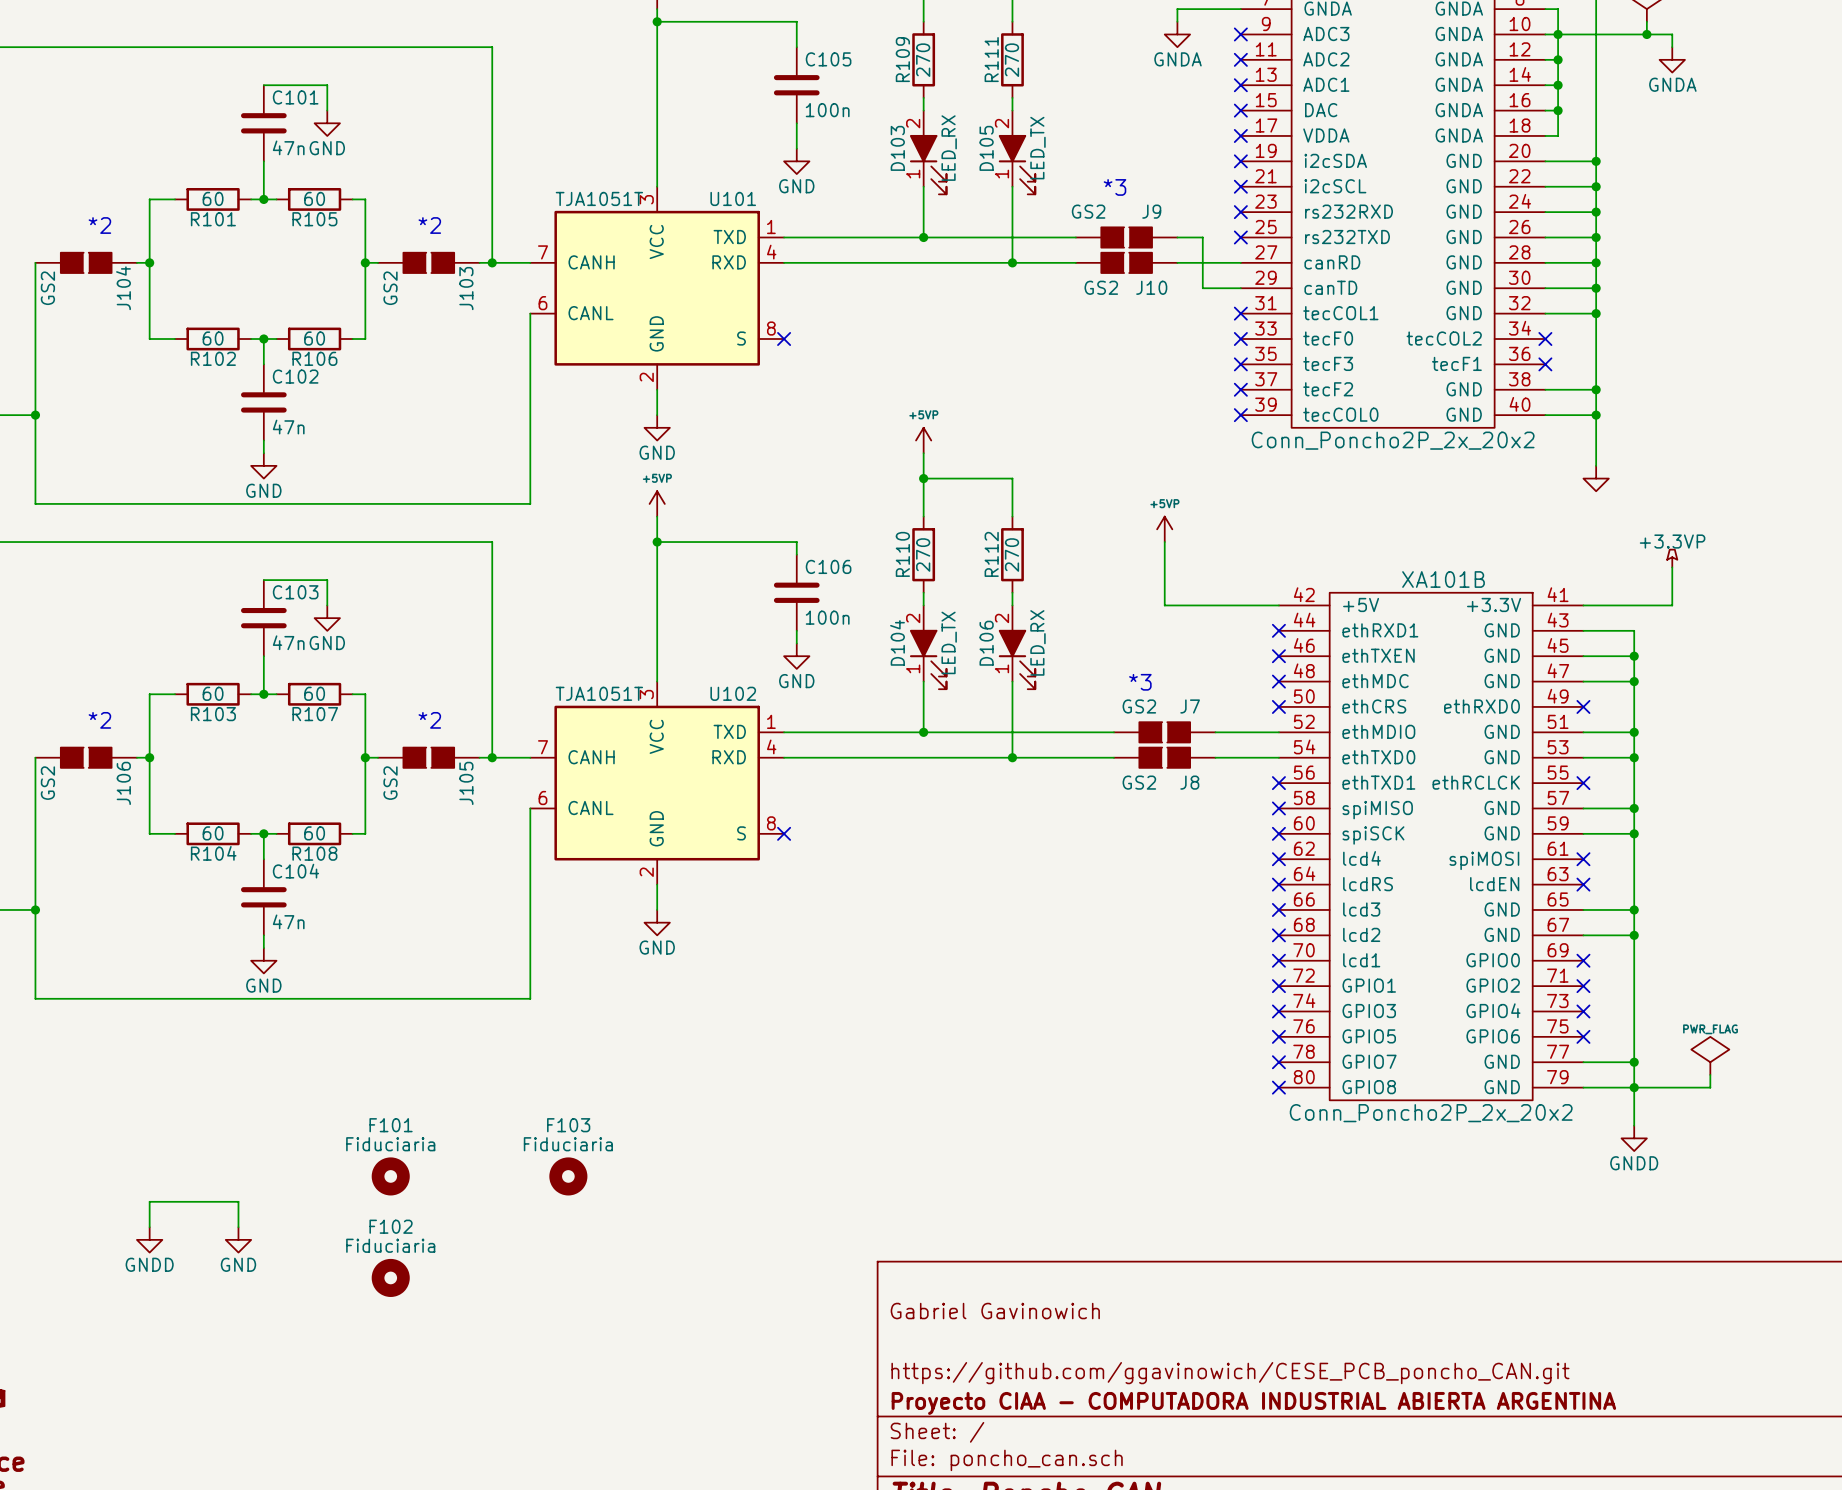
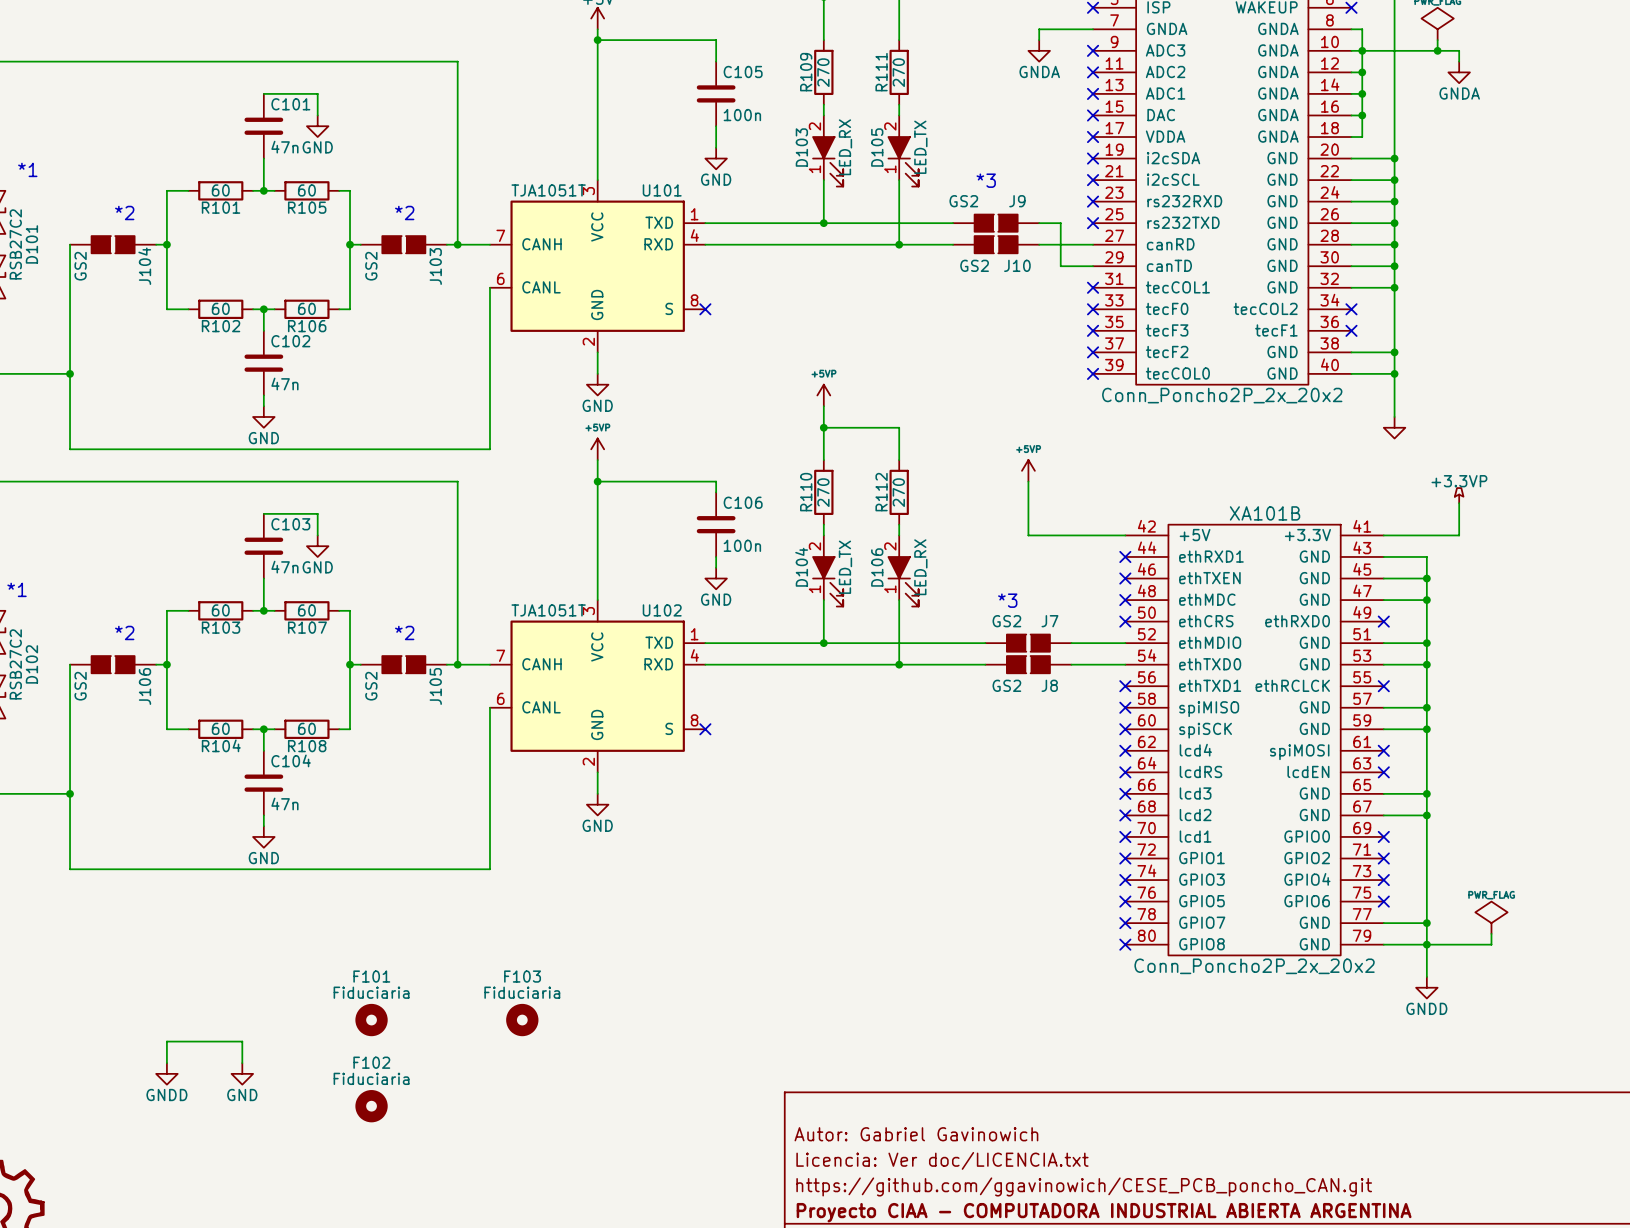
title block: Gabriel Gavinowich (995, 1311) -> Autor: Gabriel Gavinowich (916, 1134)
title block: none -> Licencia: Ver doc/LICENCIA.txt (942, 1160)

